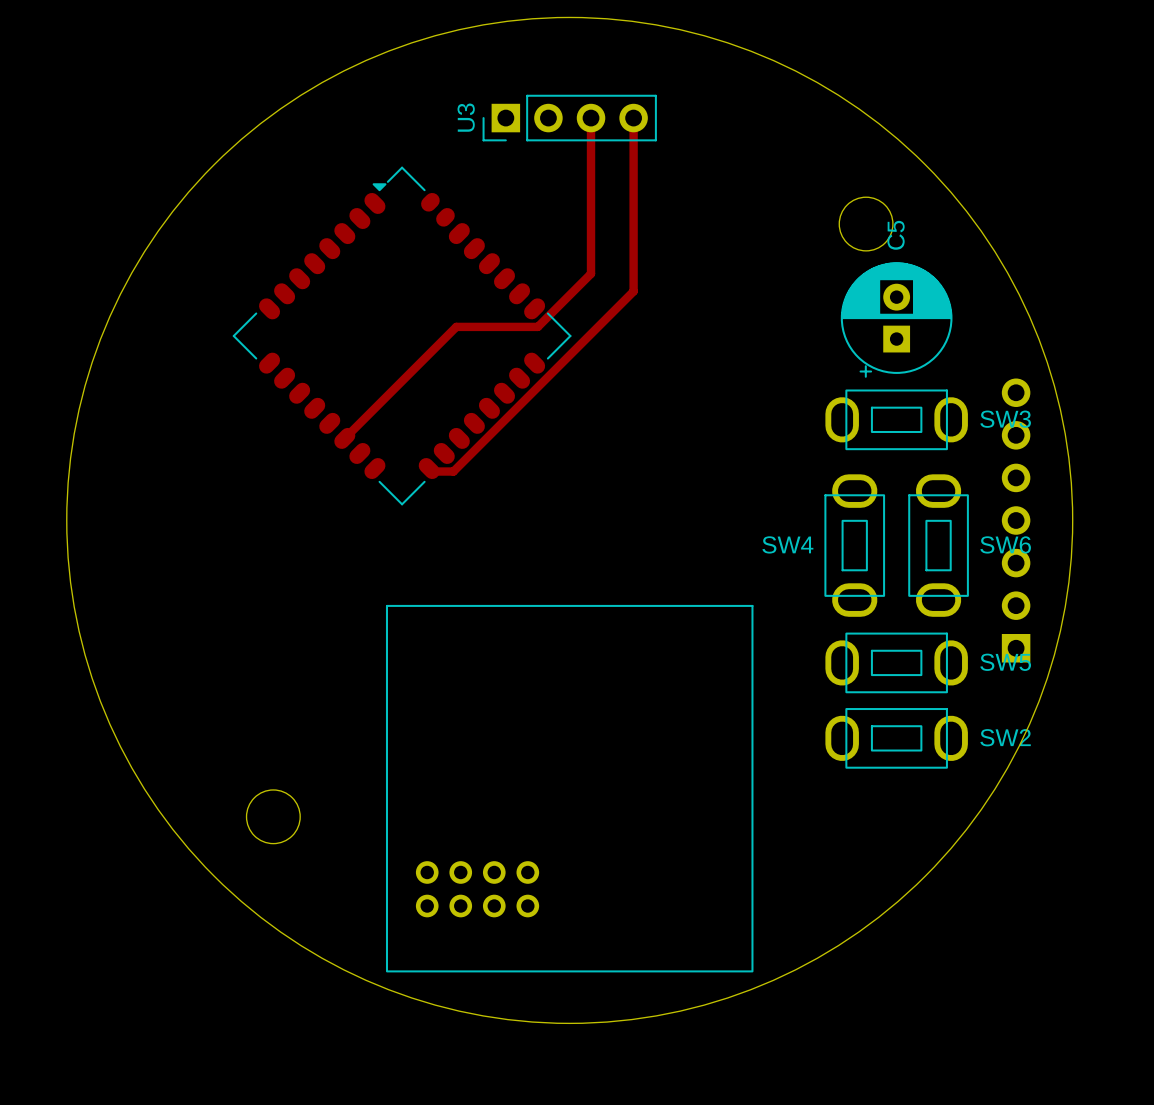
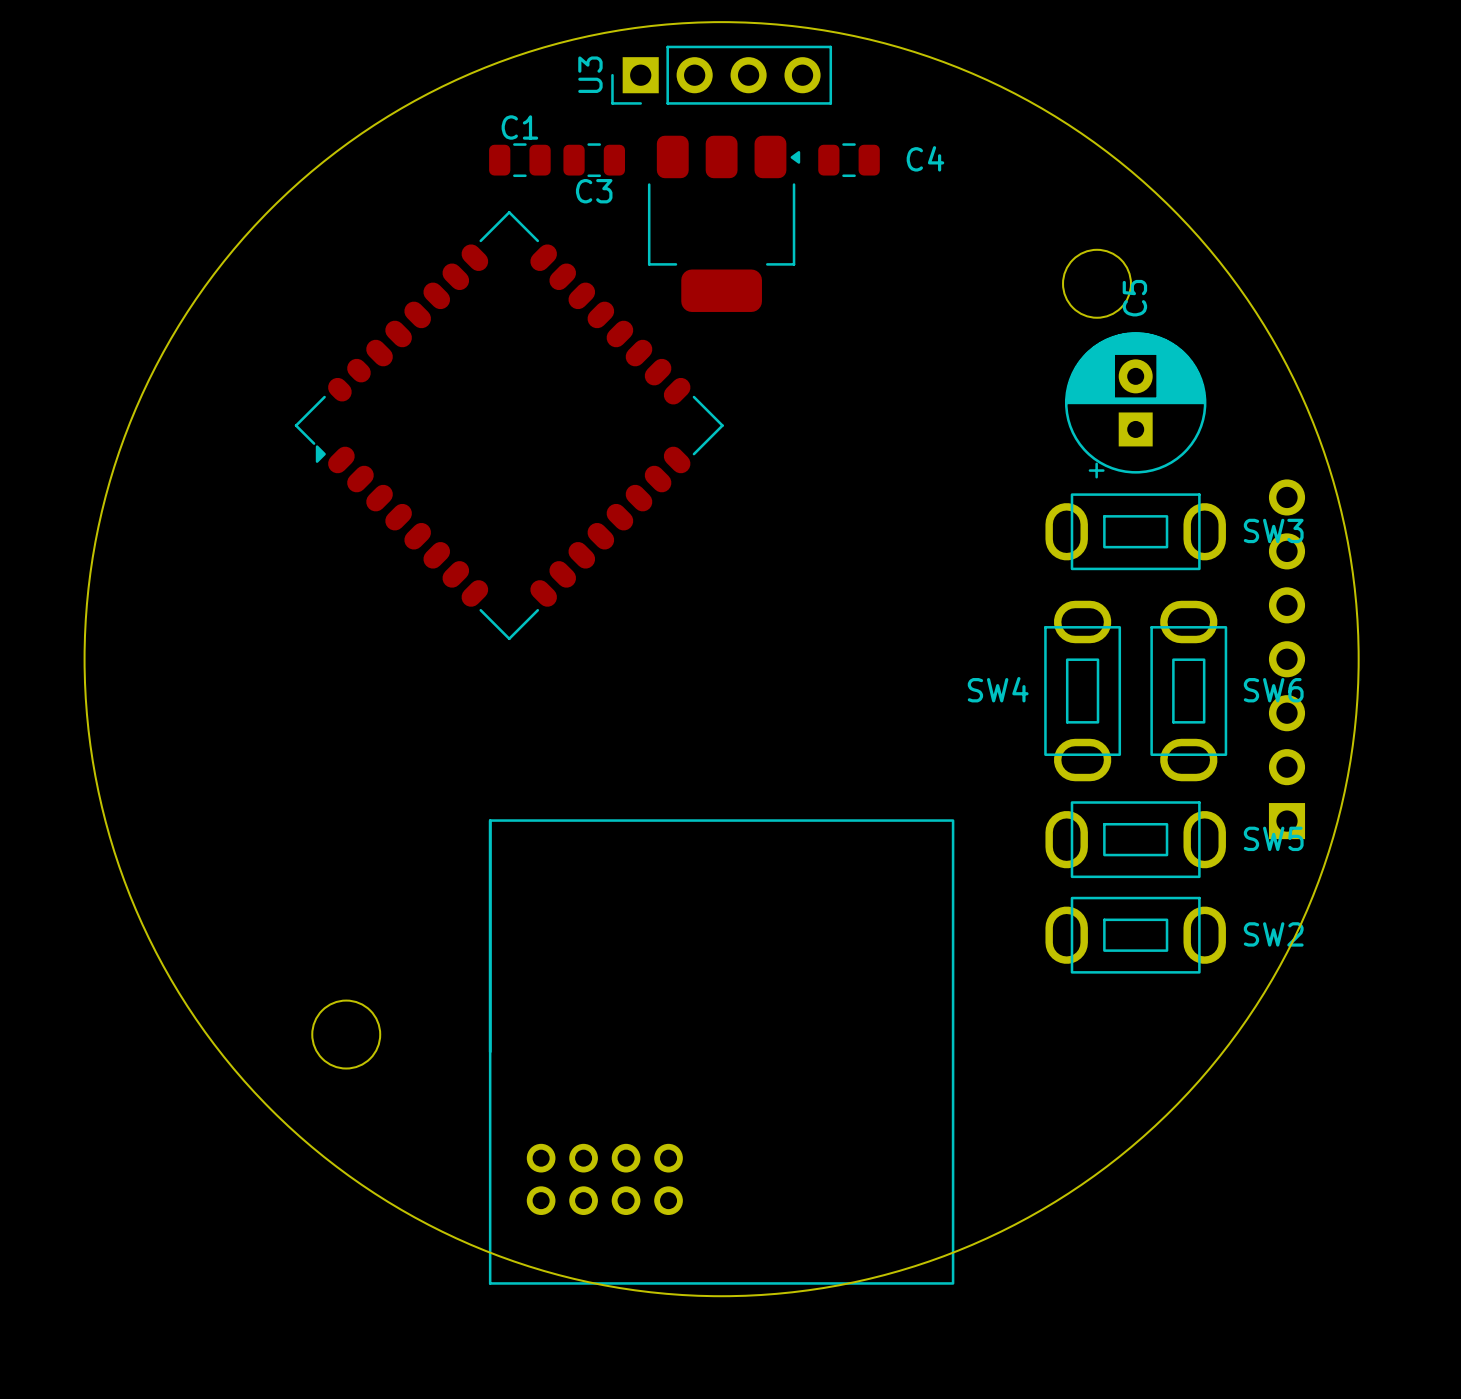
U3 position: (569, 118) -> (721, 75)
track: (591, 118) (591, 273) (537, 326) (456, 326) (344, 438) -> none
track: (633, 118) (633, 291) (453, 471) (432, 471) -> none
C1: none -> (519, 160)
C3: none -> (594, 160)
C4: none -> (849, 160)
part: none -> (724, 223)
part rotation: 0° (402, 336) -> 90° counterclockwise (509, 425)
part position: (569, 788) -> (721, 1052)

